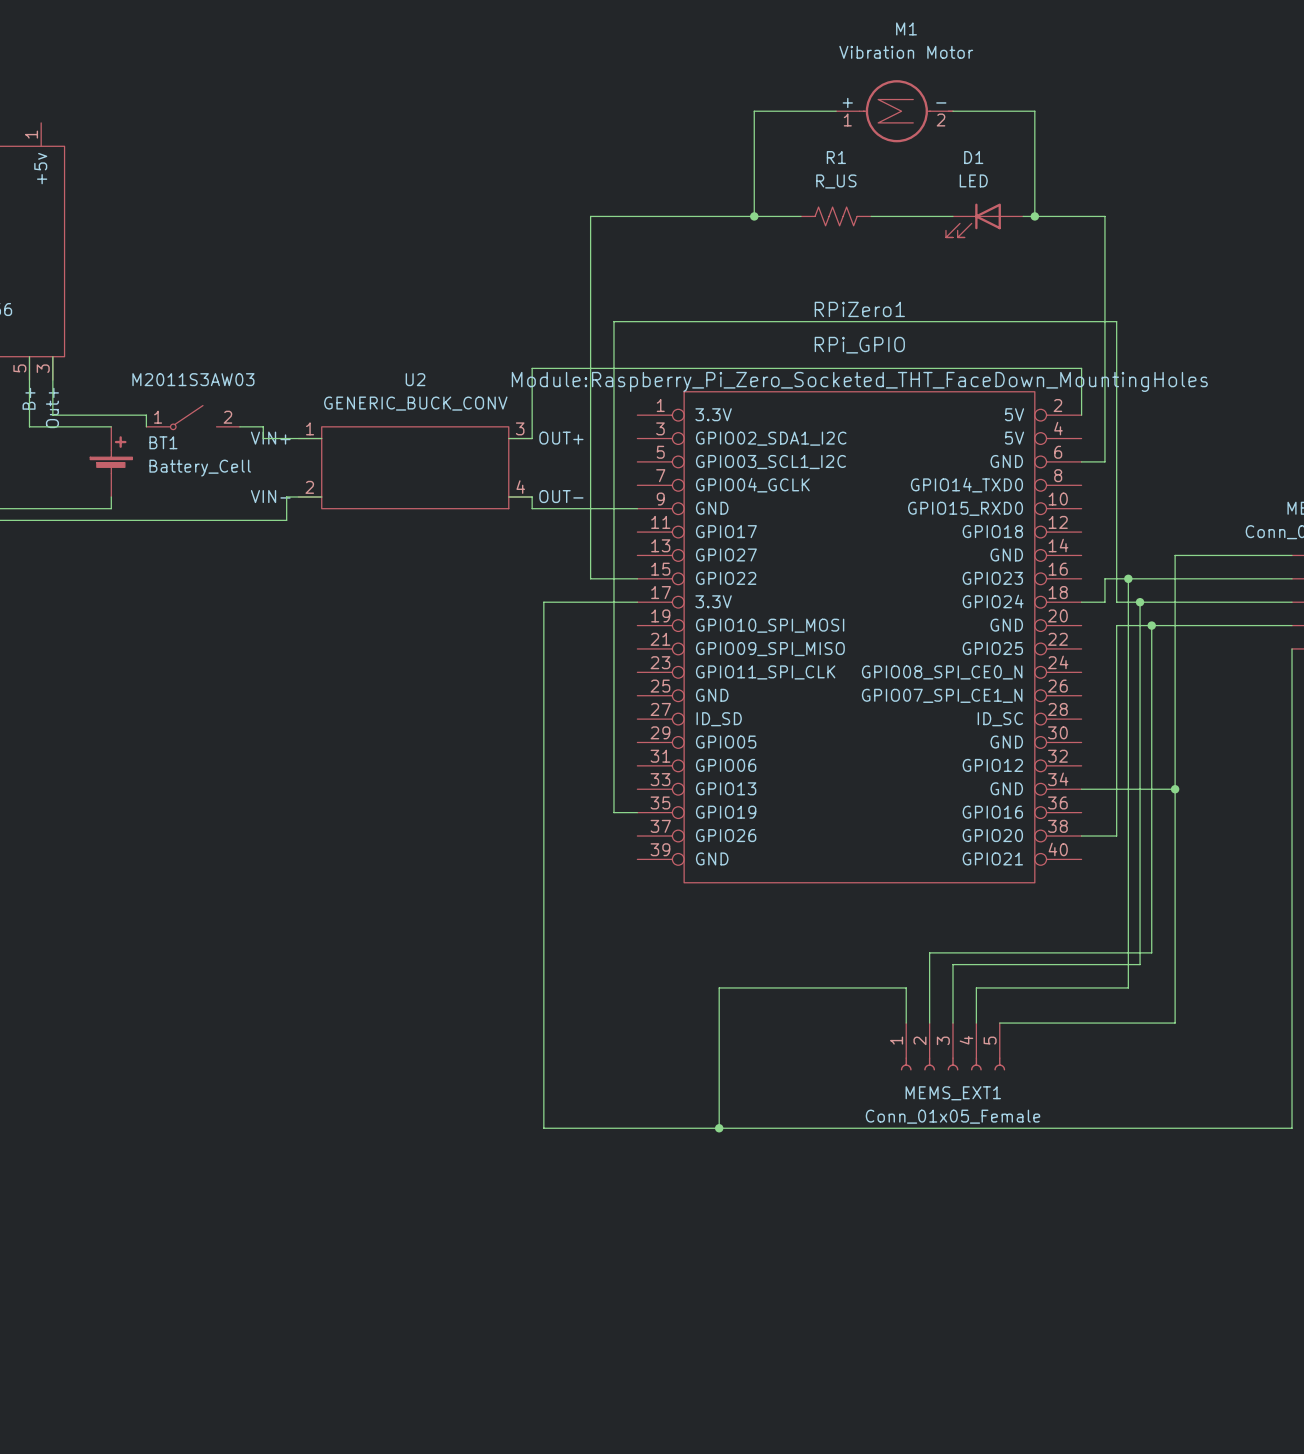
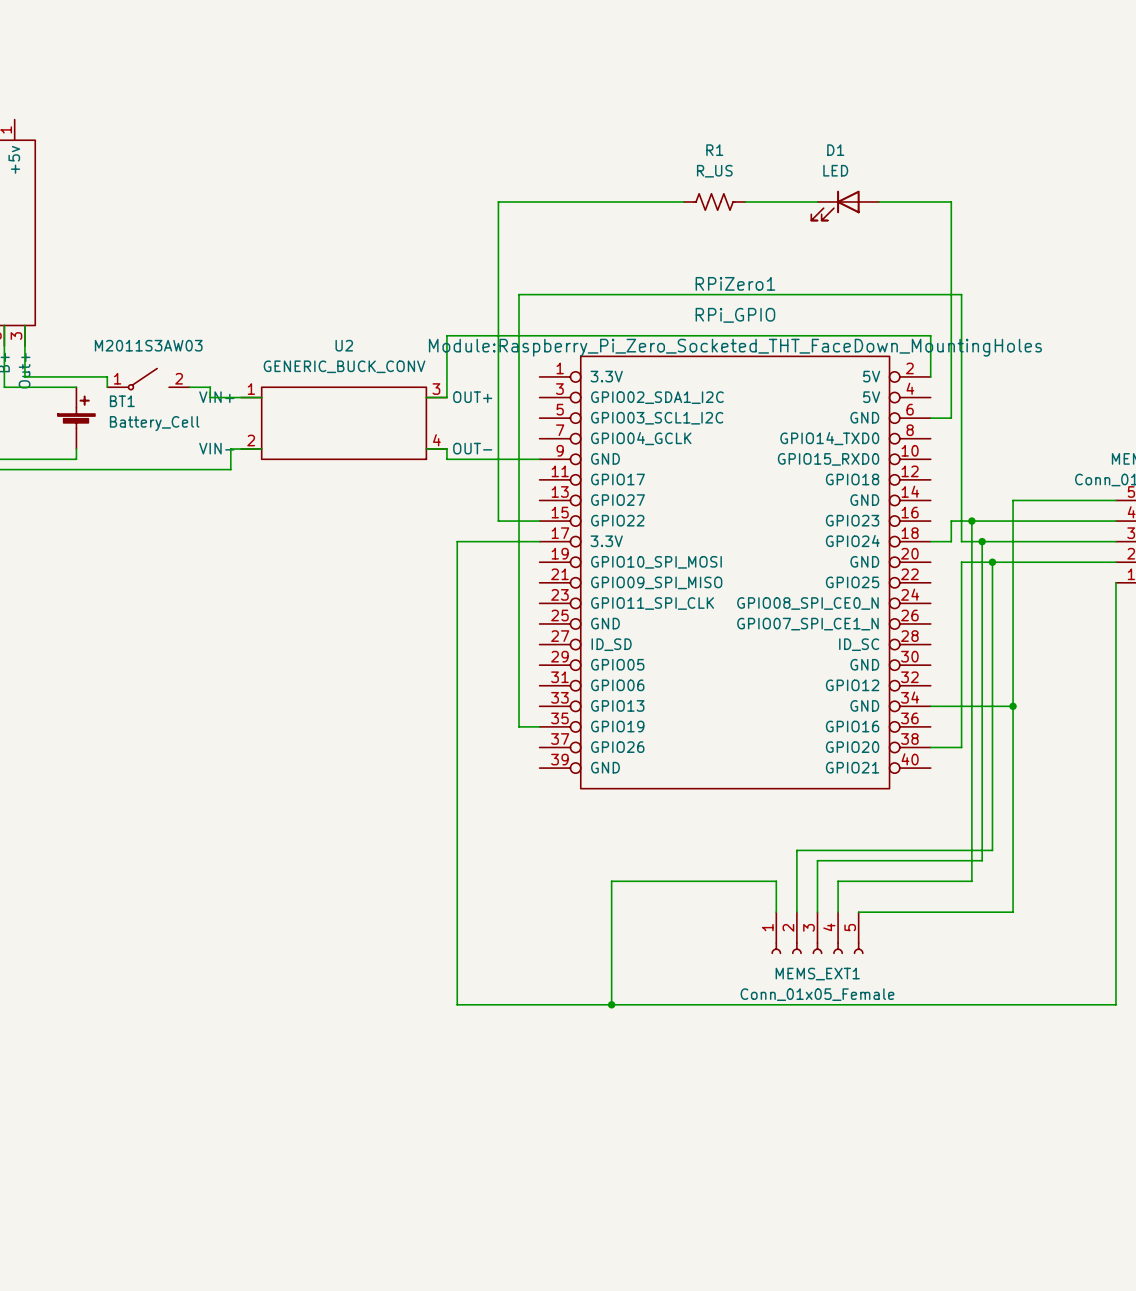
wire: (836, 111) (754, 111) (754, 216) -> none
M1: Vibration Motor (894, 111) -> none
wire: (952, 111) (1034, 111) (1034, 216) -> none
junction: (754, 216) -> none
junction: (1034, 216) -> none

